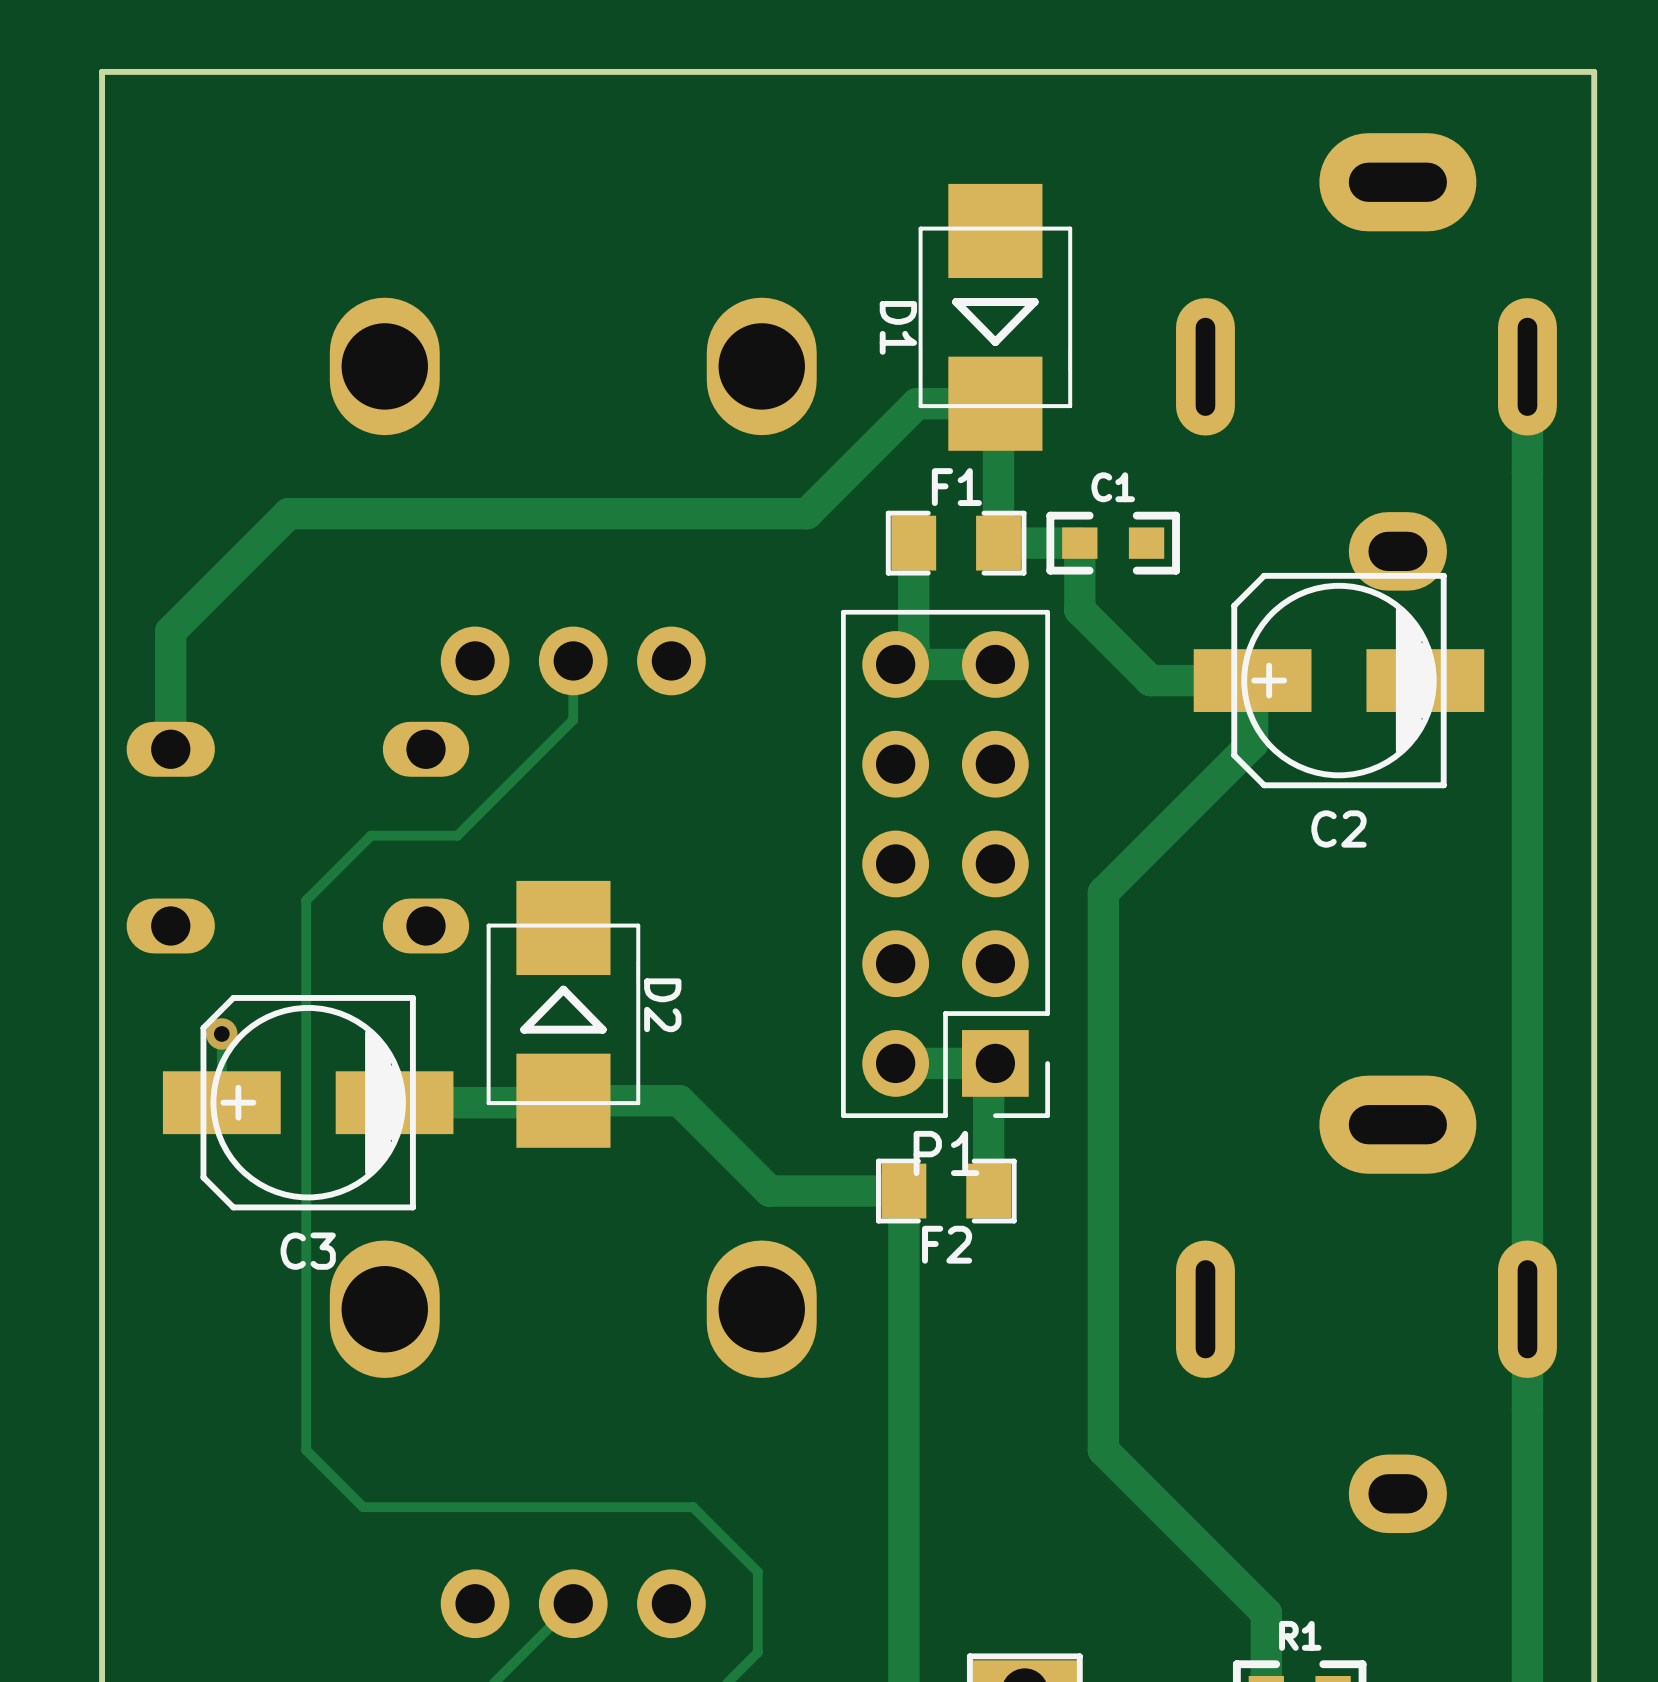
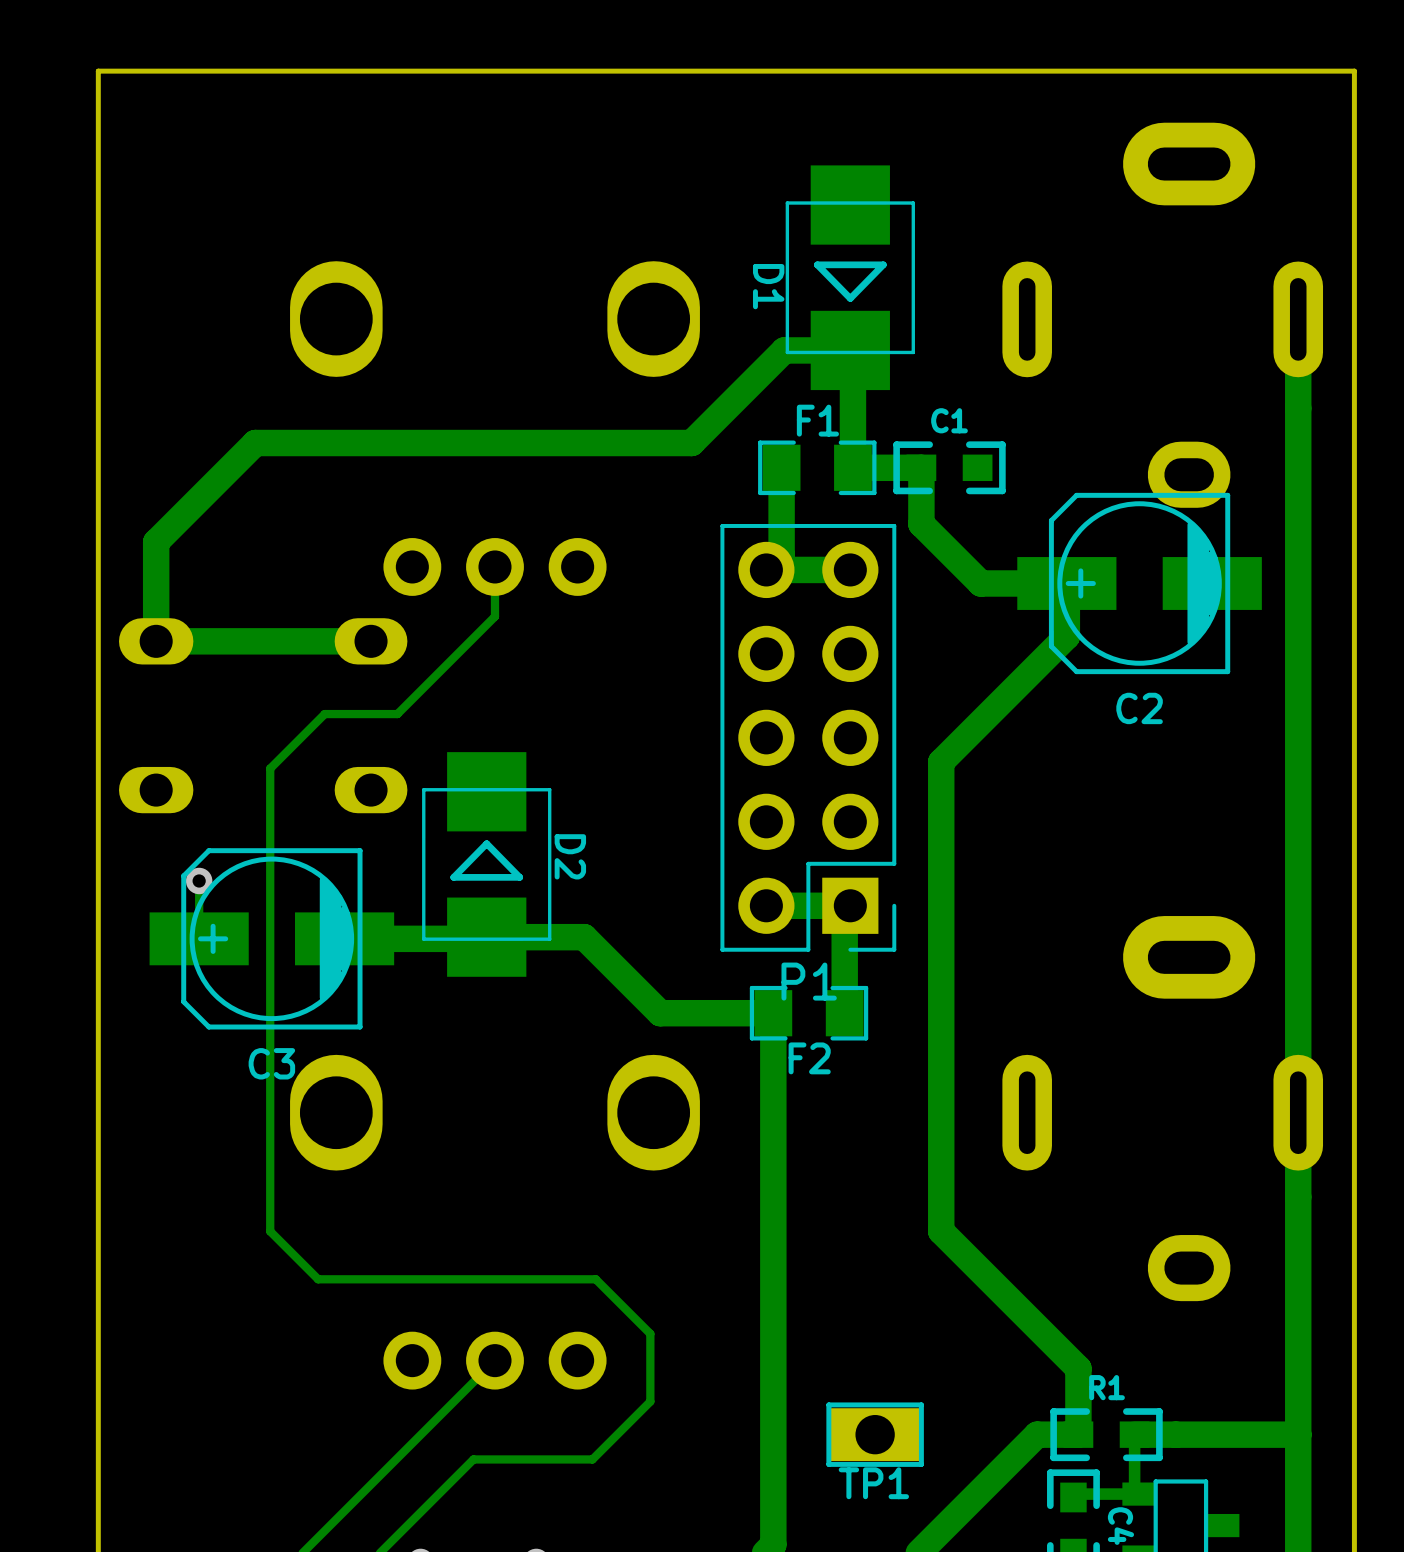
track: none -> (371, 641) (156, 641)

